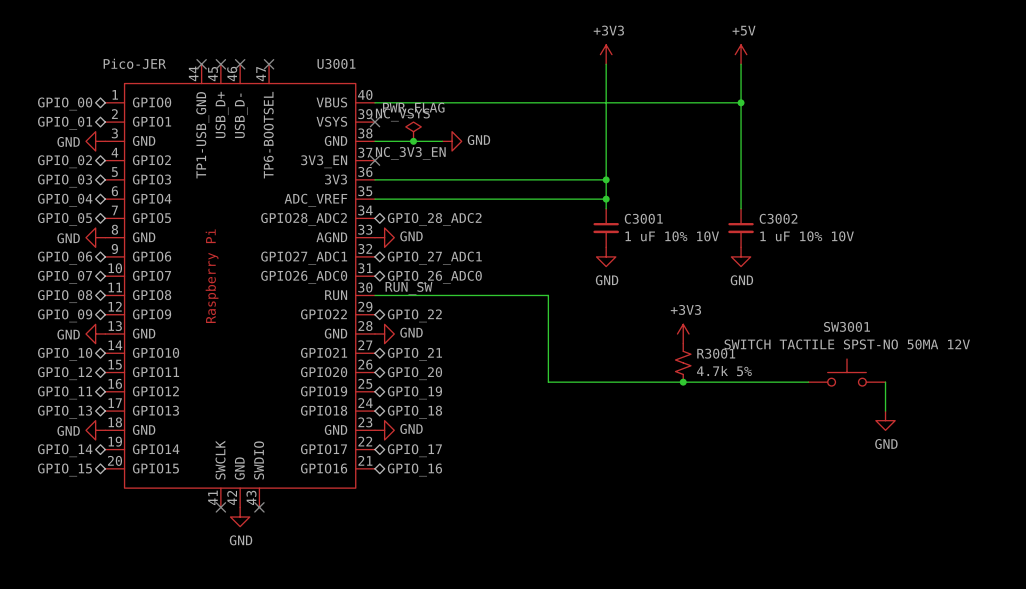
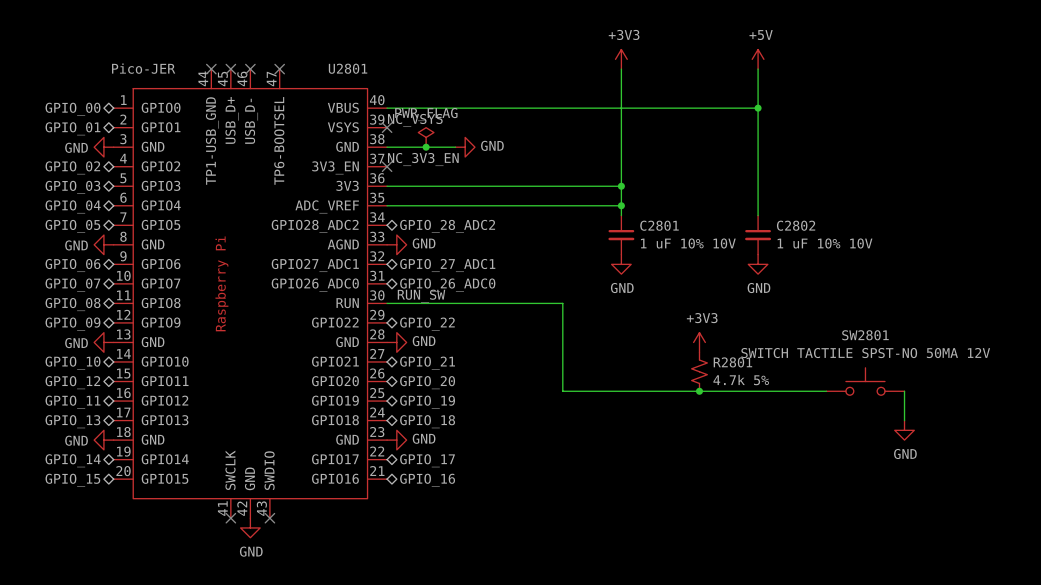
U3001 name: U3001 (336, 63) -> U2801 (348, 68)
C3001 name: C3001 (643, 218) -> C2801 (659, 225)
C3002 name: C3002 (778, 218) -> C2802 (796, 225)
SW3001 name: SW3001 (846, 326) -> SW2801 (865, 335)
R3001 name: R3001 (716, 353) -> R2801 (732, 362)

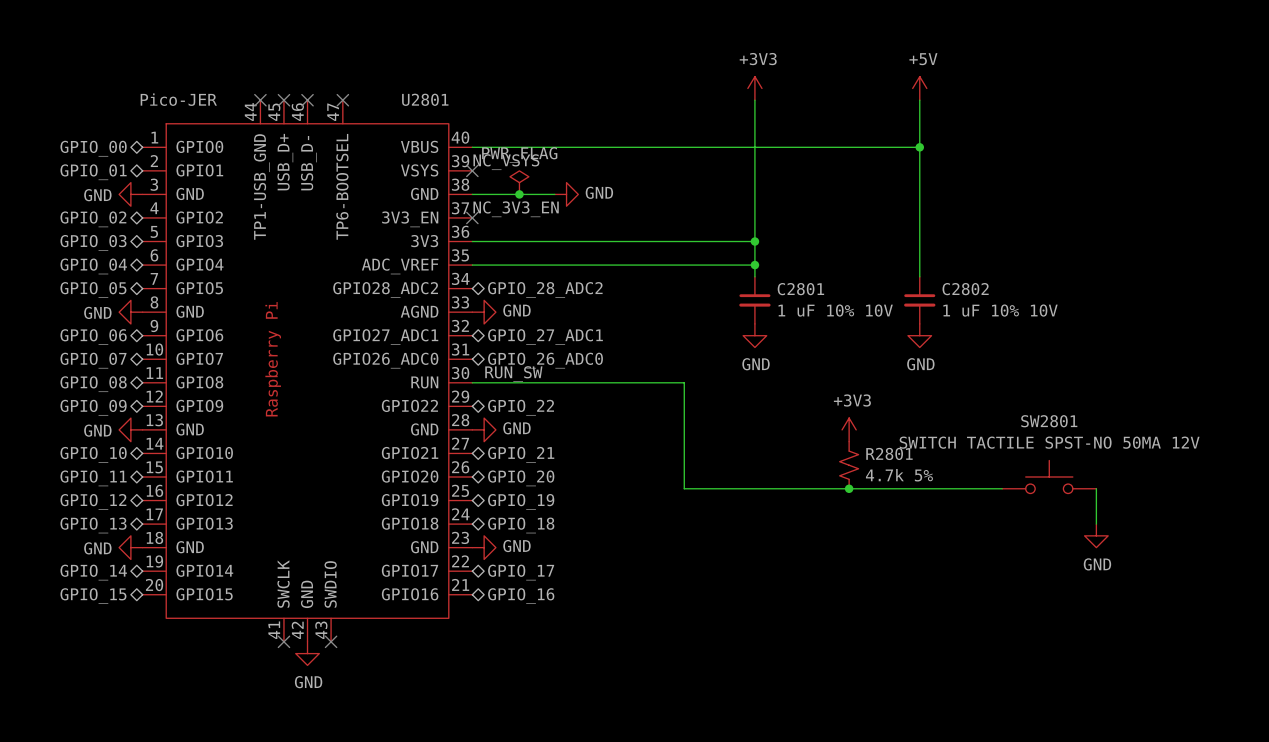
hierarchical label: GPIO_12 (72, 382) -> GPIO_11 (93, 478)
hierarchical label: GPIO_11 (72, 402) -> GPIO_12 (93, 501)

